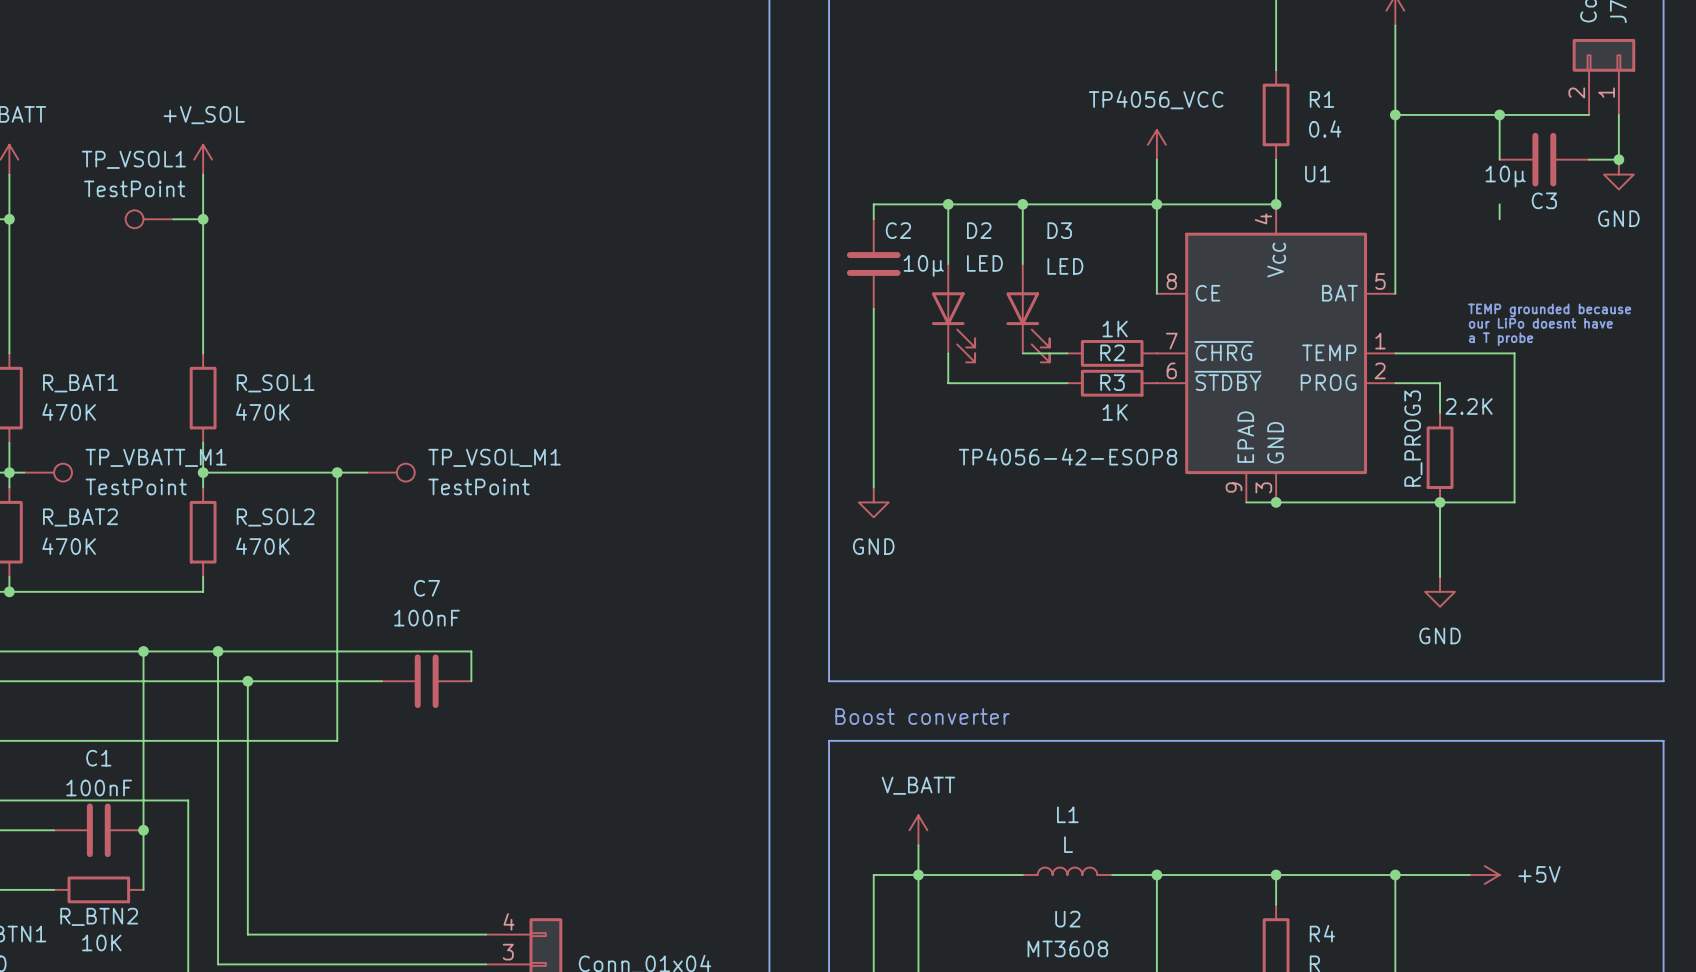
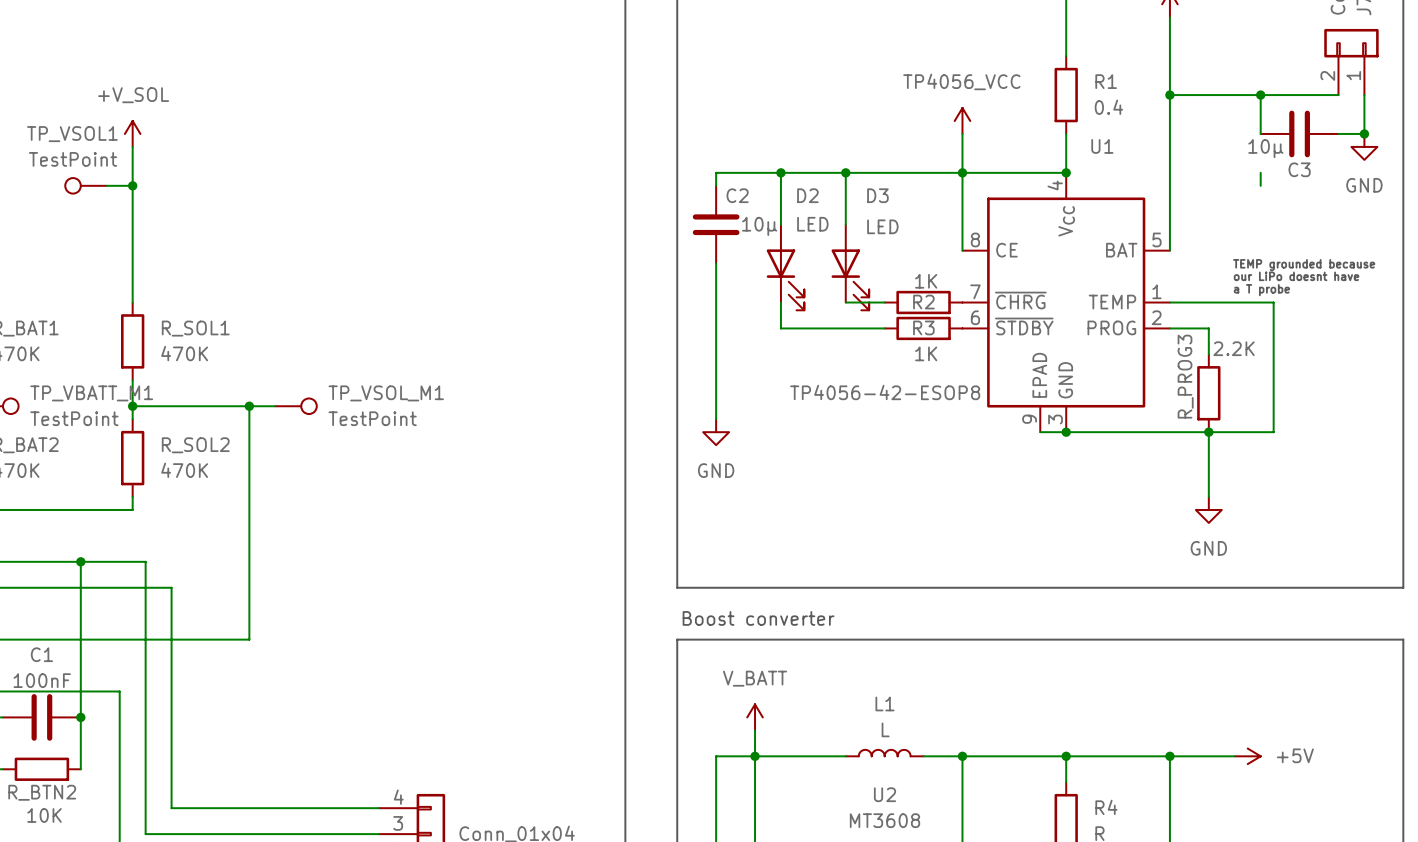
wire: (218, 651) (471, 651) (471, 681) -> none
junction: (218, 651) -> none
wire: (247, 681) (381, 681) -> none
junction: (247, 681) -> none
C7: 100nF (426, 681) -> none

